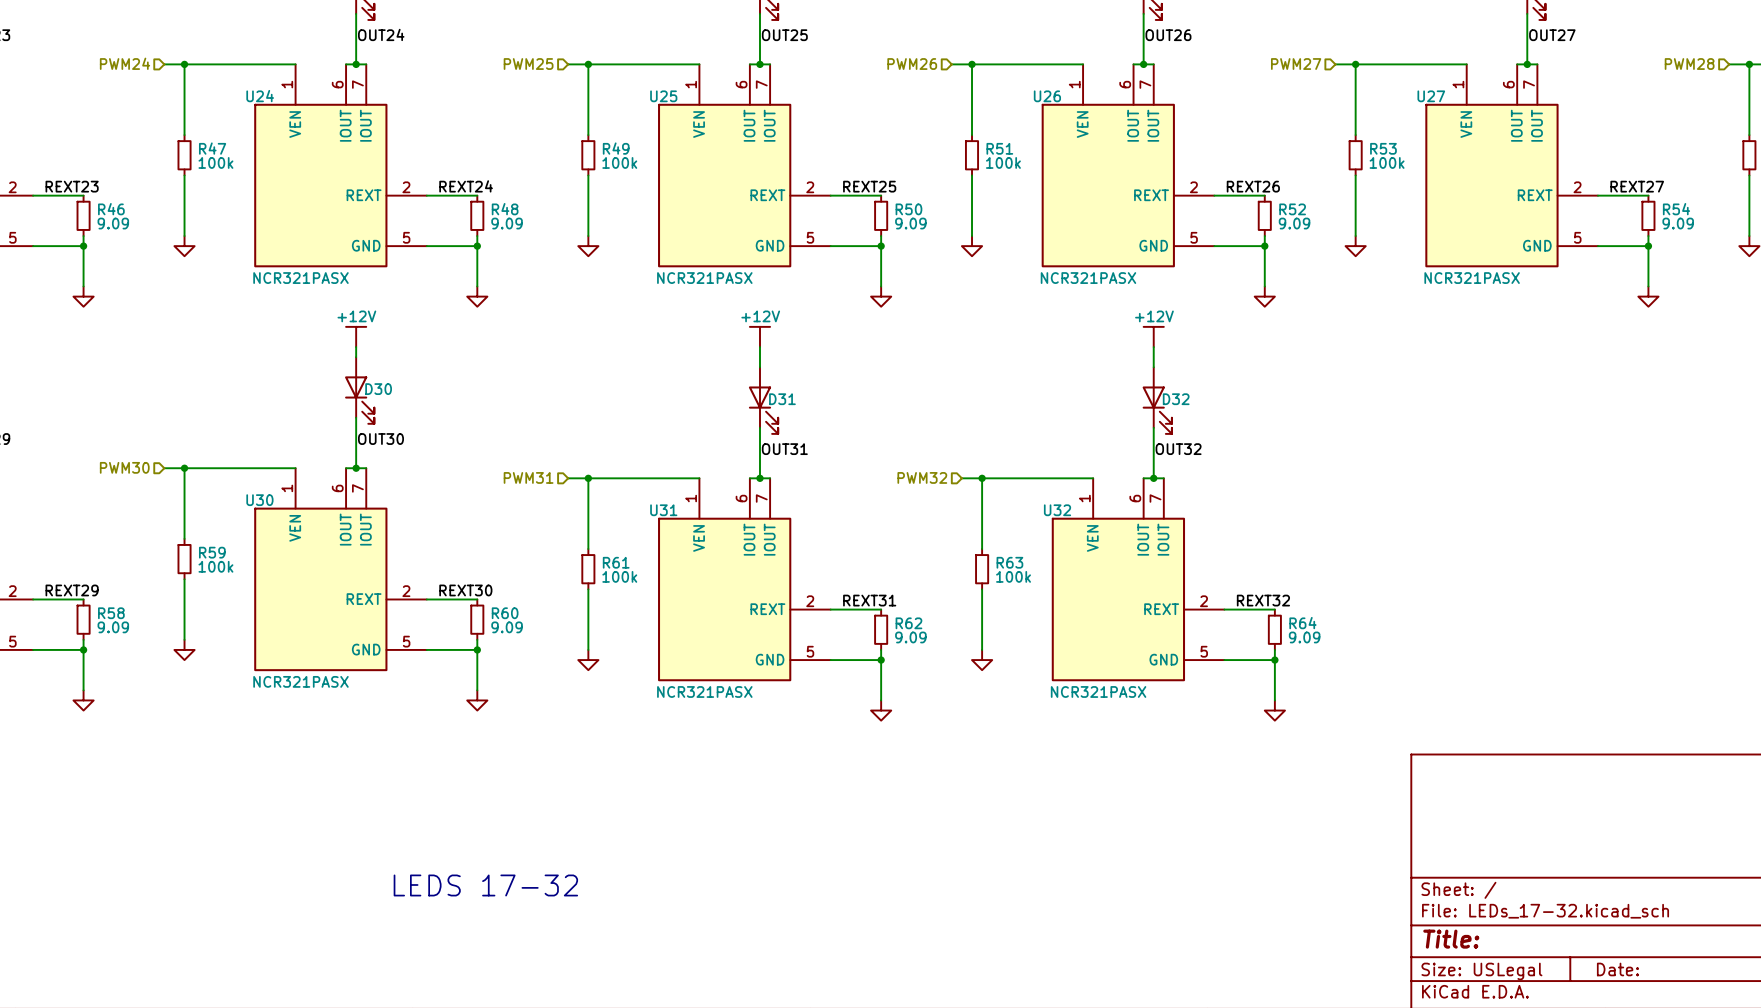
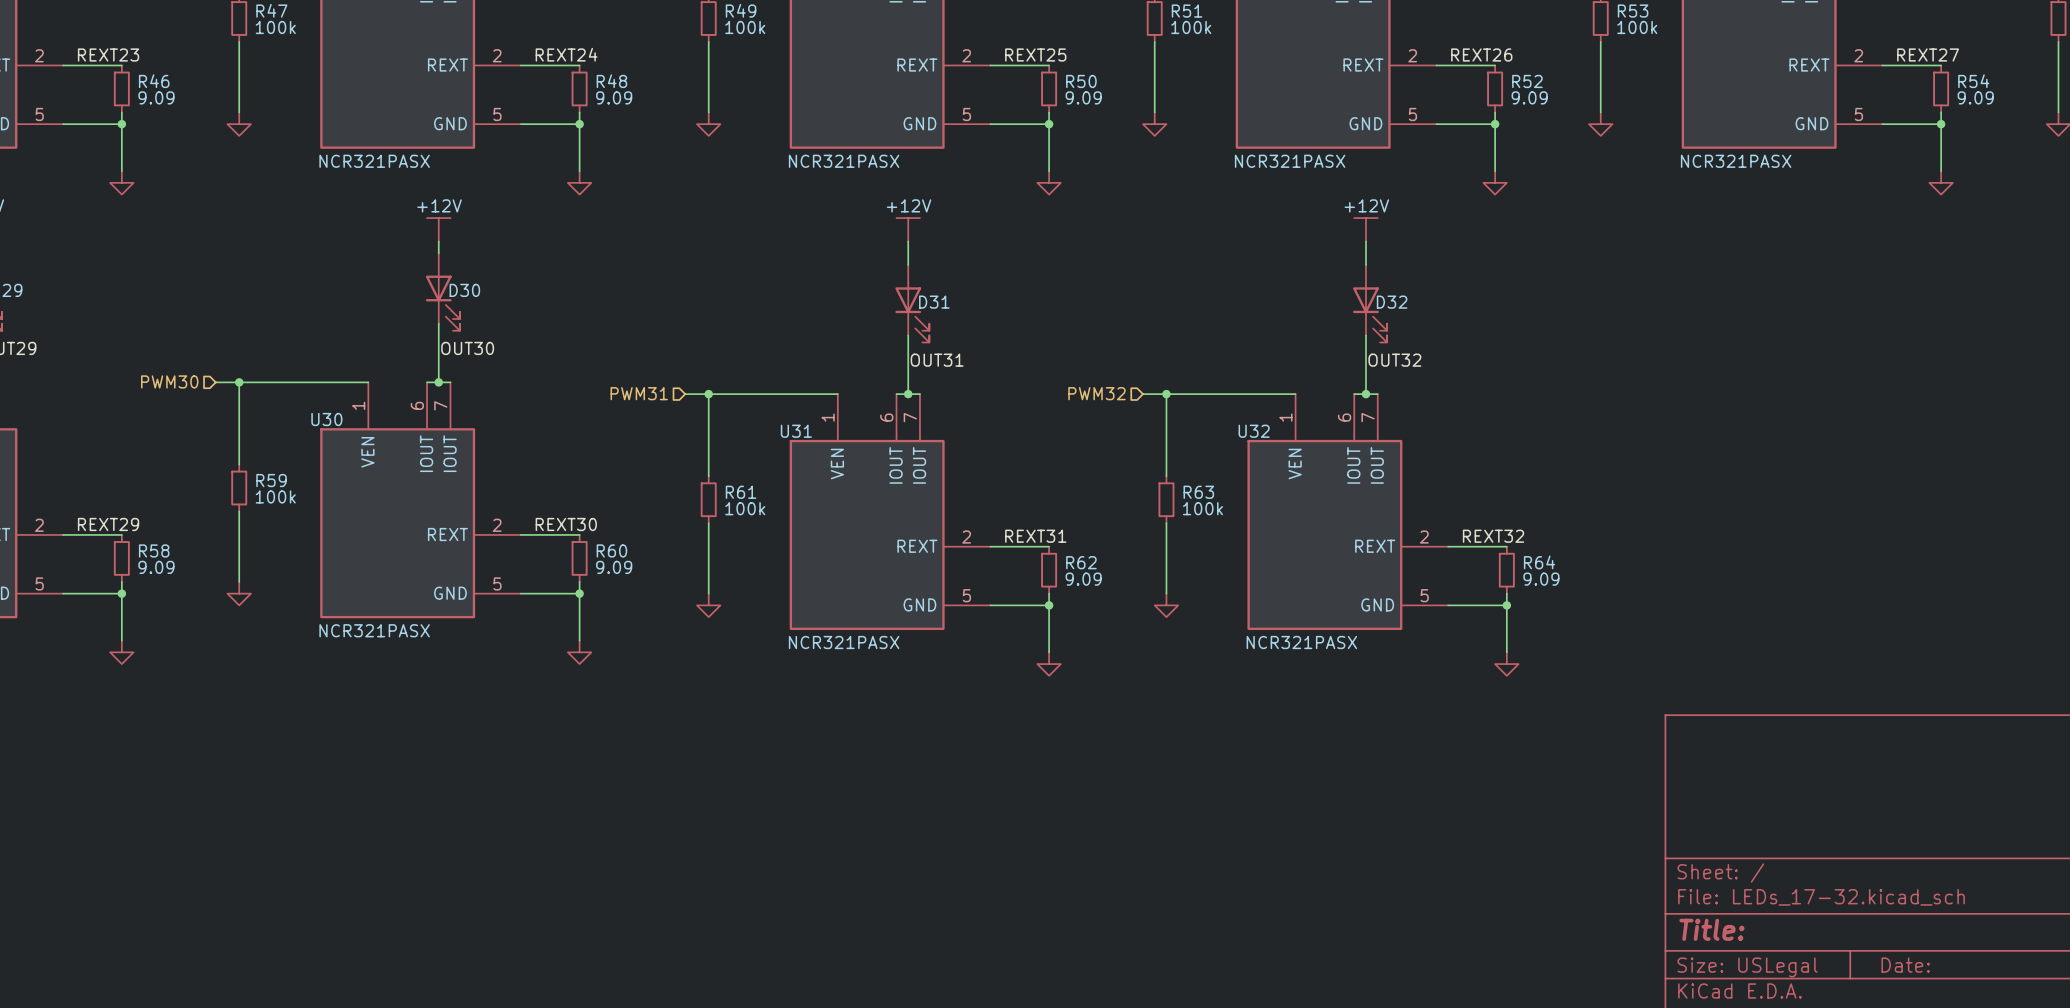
text: LEDS 17-32 (485, 885) -> none

